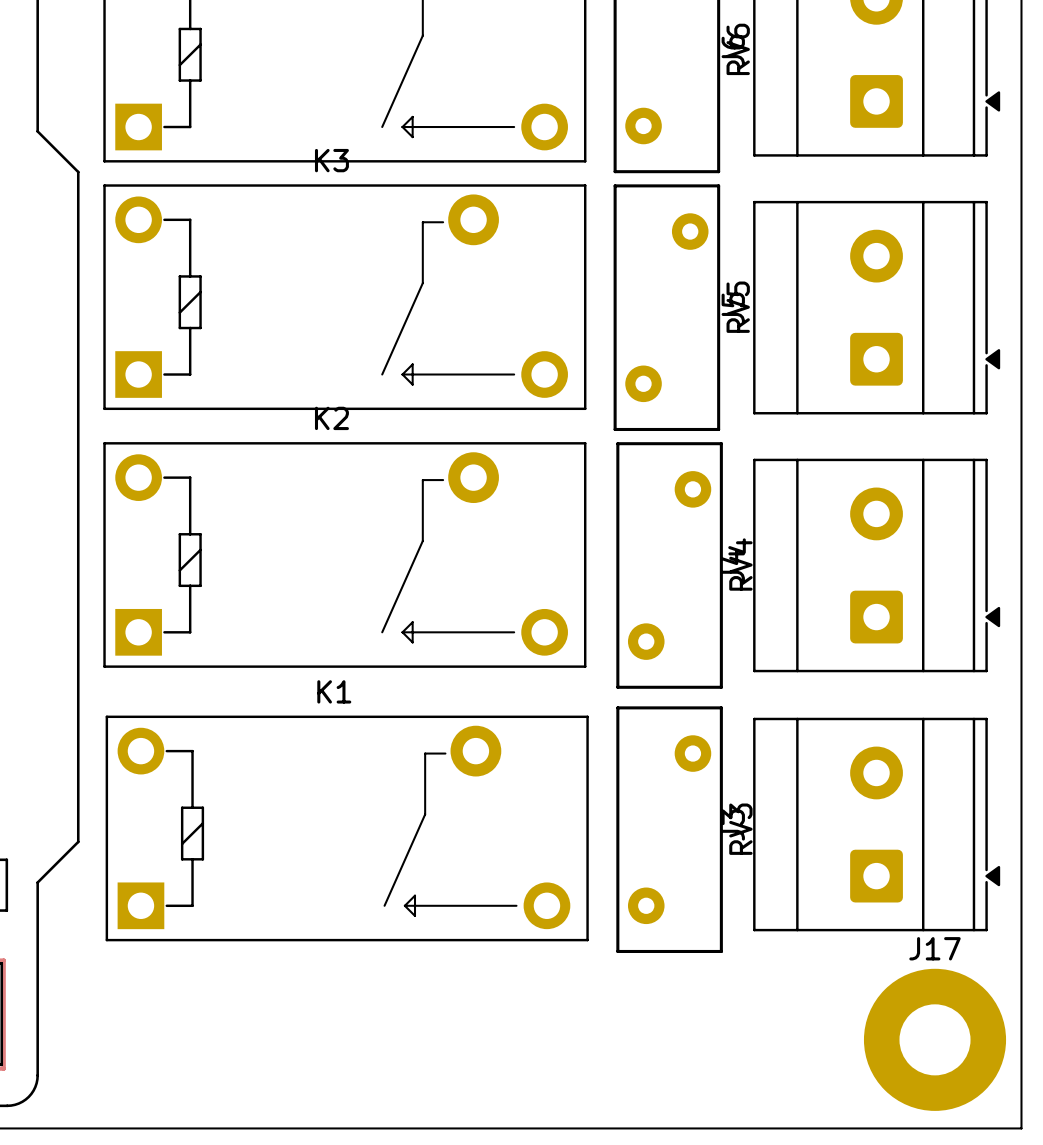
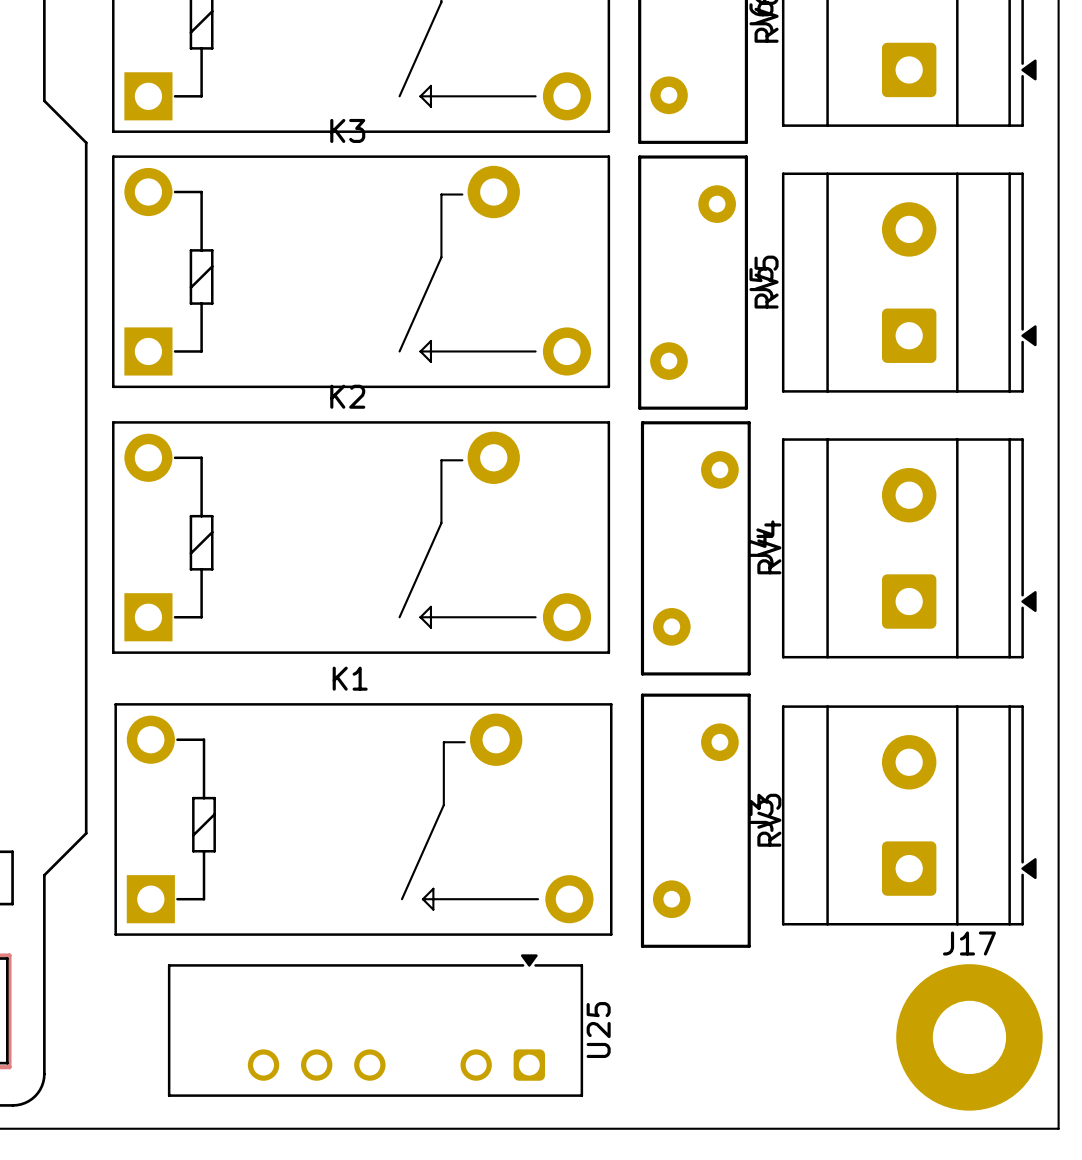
U25: none -> (375, 1025)

